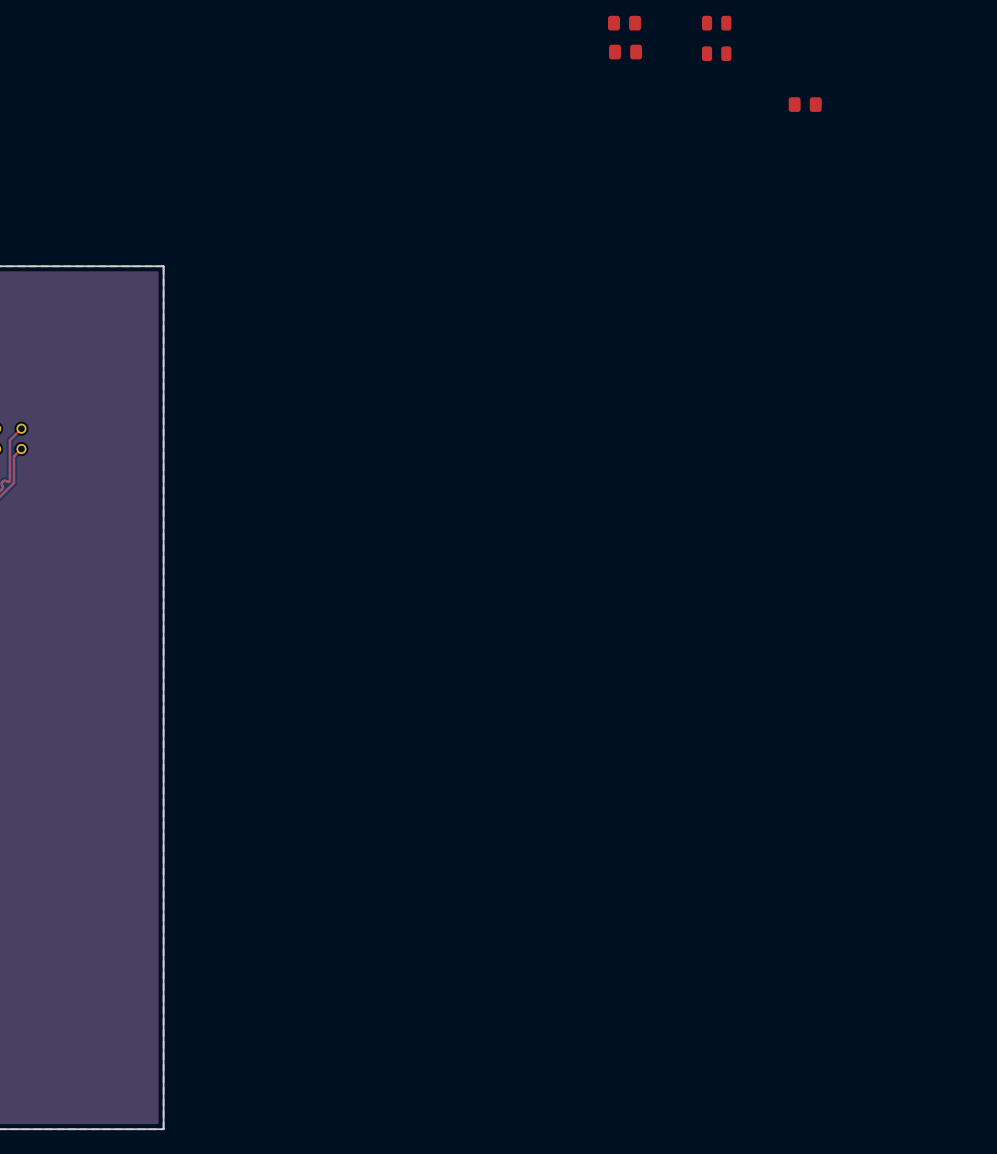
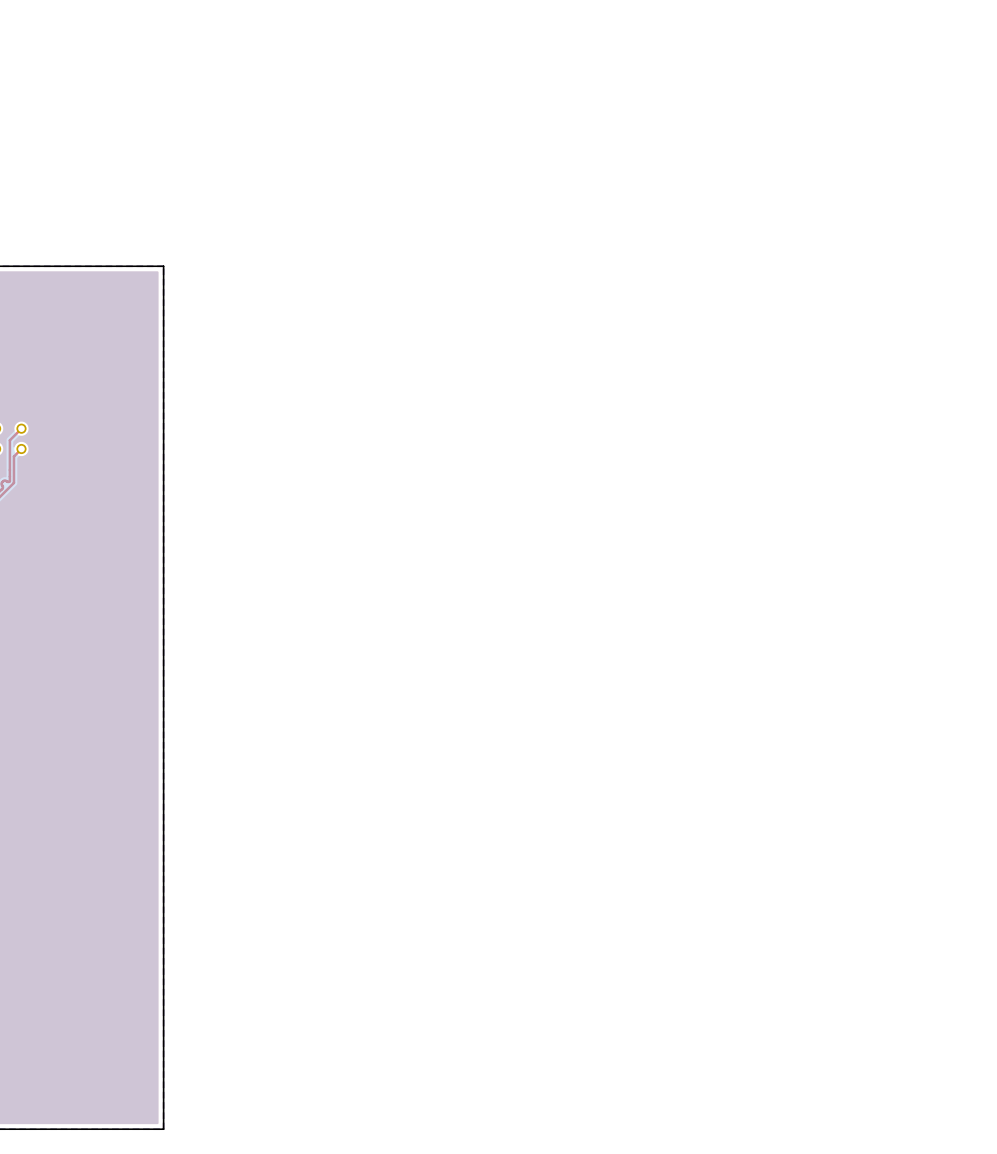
part: (624, 23) -> none
part: (716, 23) -> none
part: (625, 52) -> none
part: (716, 53) -> none
part: (805, 104) -> none

